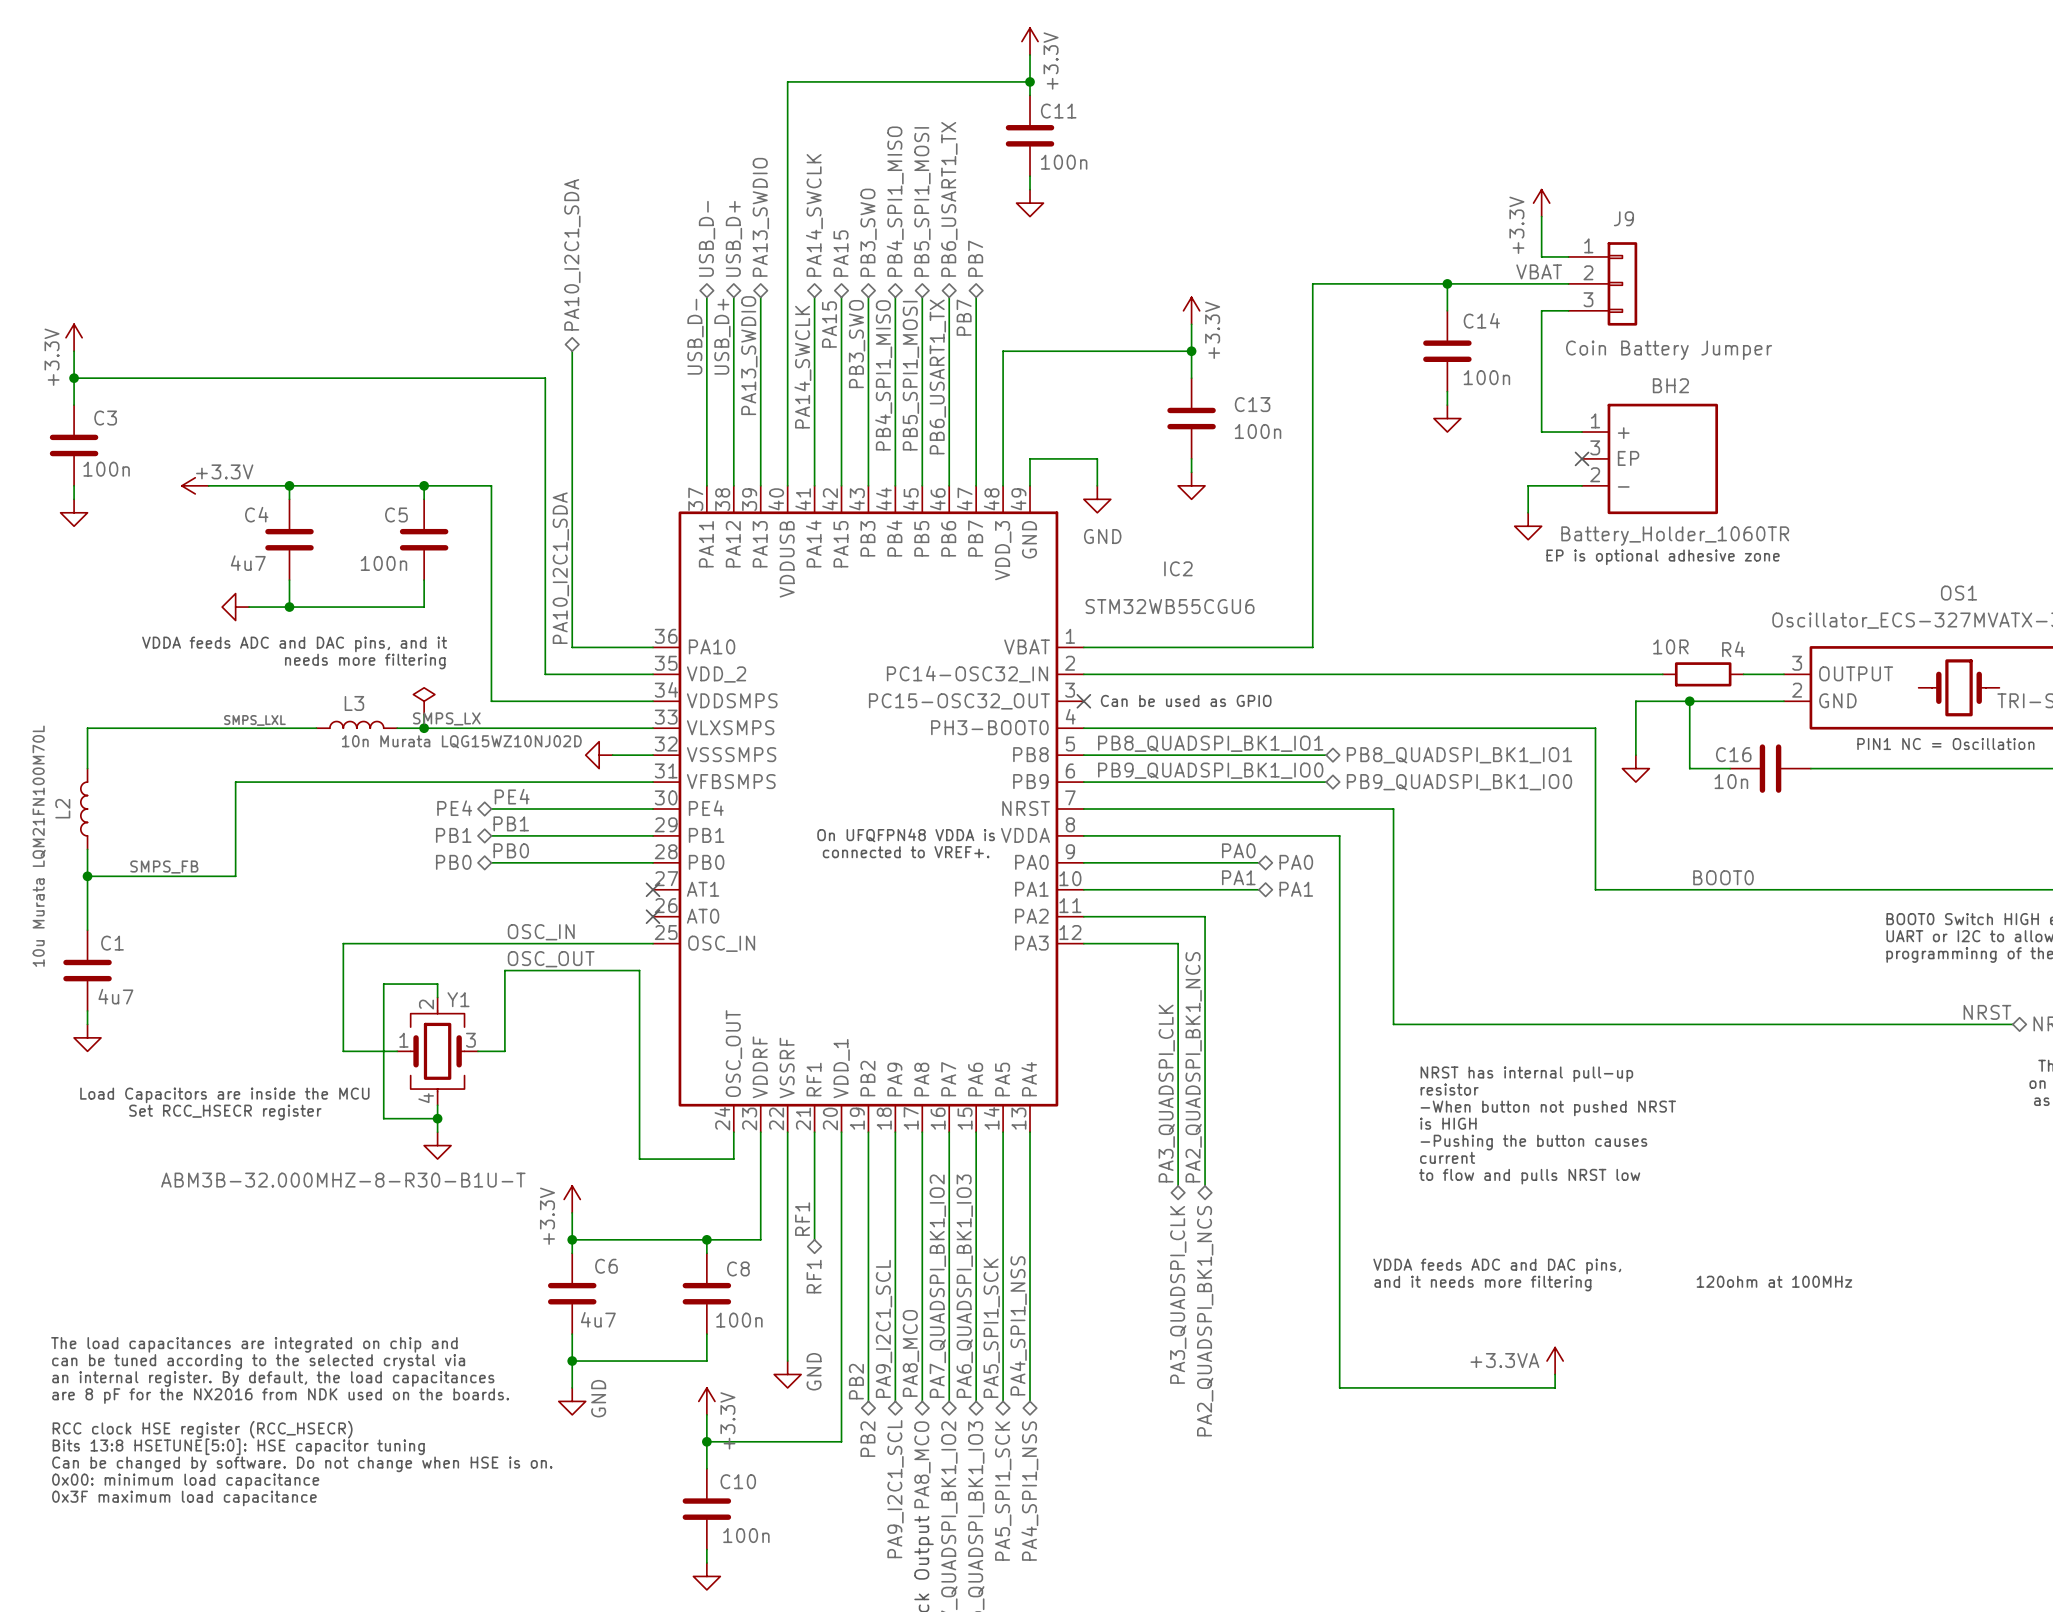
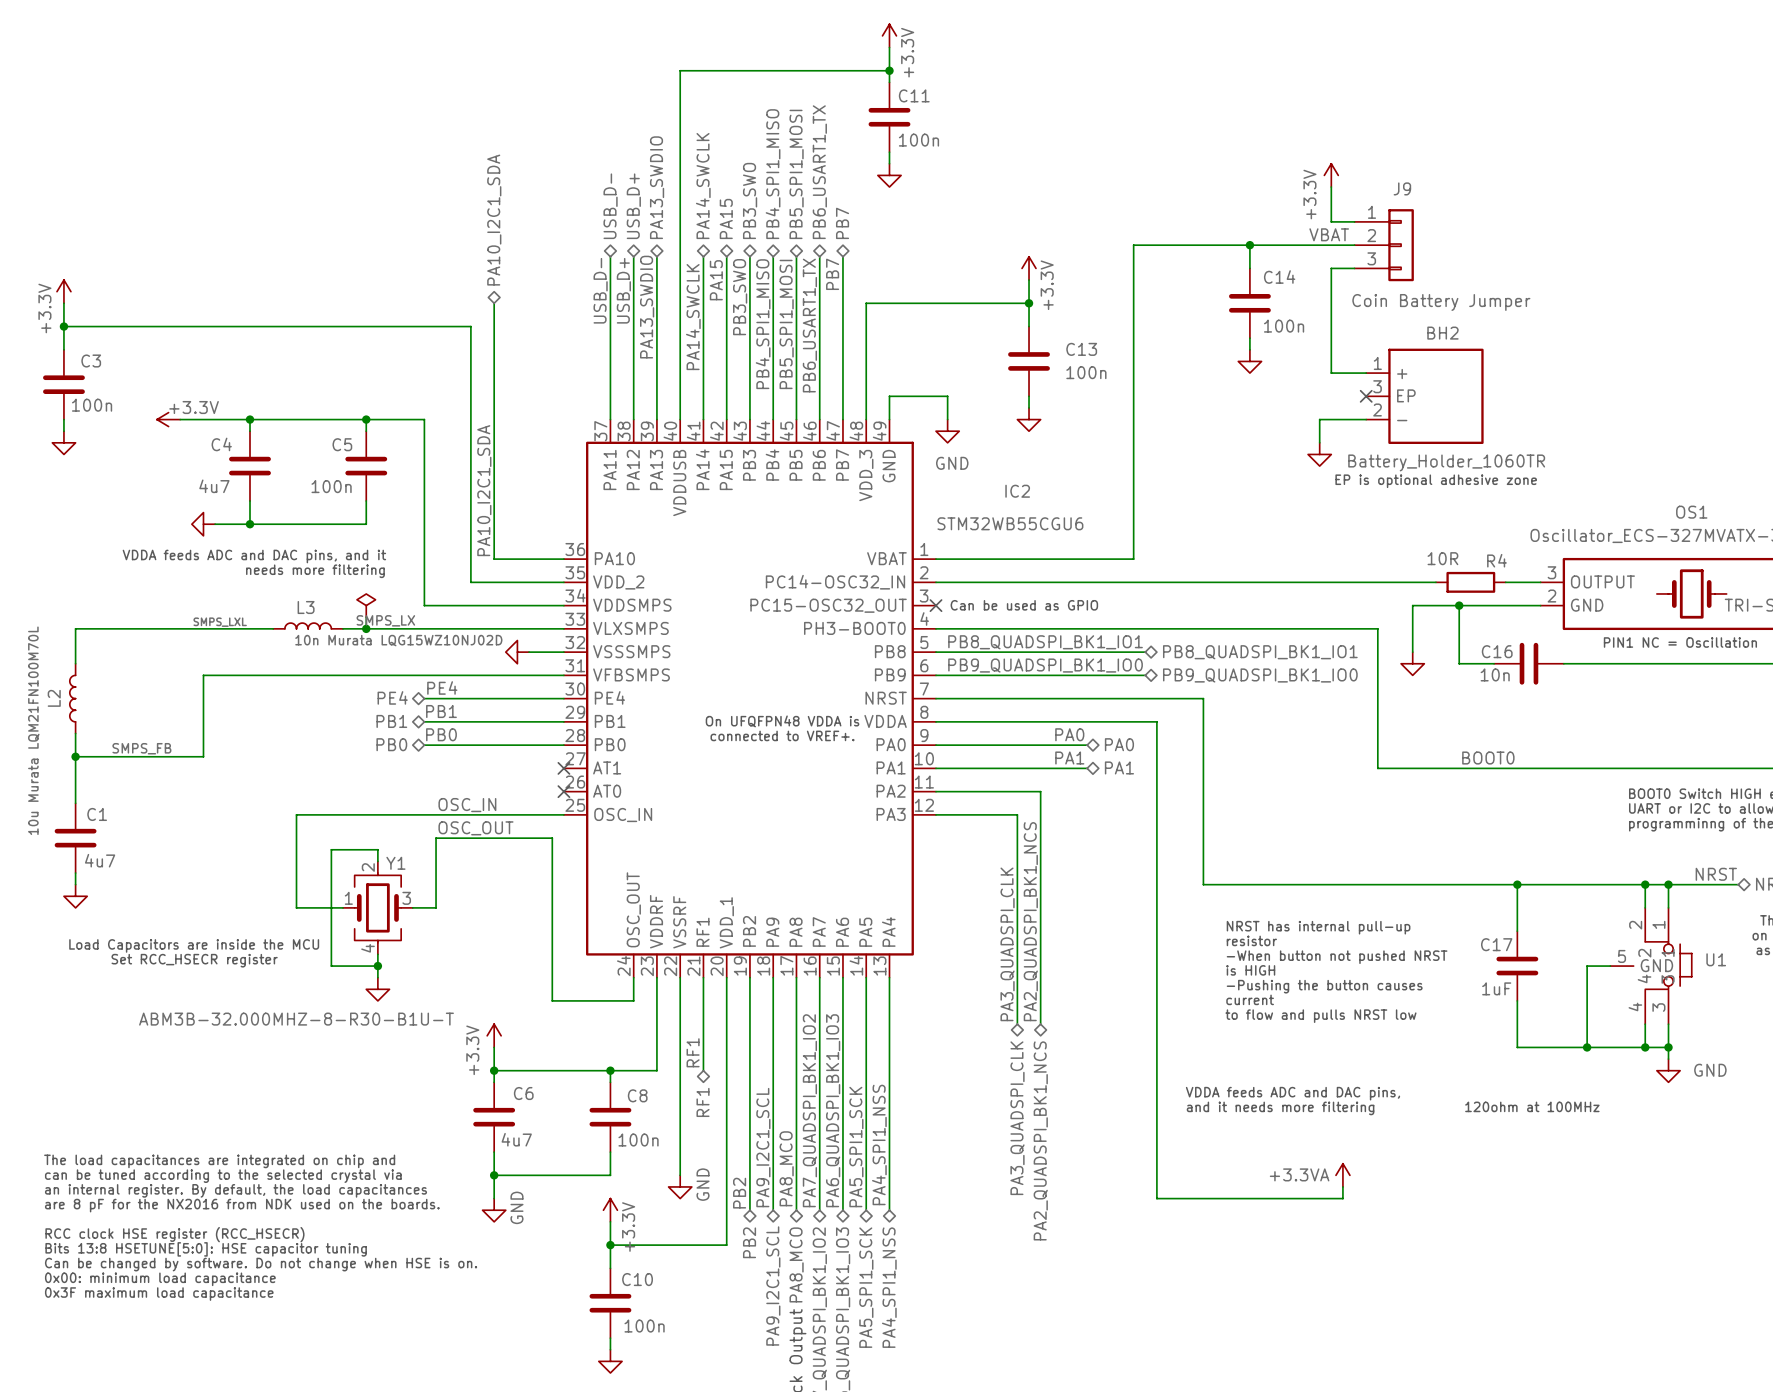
wire: none -> (1517, 884) (1517, 931)
junction: none -> (1517, 884)
wire: none -> (1645, 884) (1645, 907)
junction: none -> (1645, 884)
wire: none -> (1668, 884) (1668, 907)
junction: none -> (1668, 884)
C17: none -> 1uF (1517, 966)
wire: none -> (1610, 966) (1587, 966) (1587, 1047)
U1: none -> (1651, 966)
wire: none -> (1517, 1000) (1517, 1047) (1668, 1047)
wire: none -> (1645, 1024) (1645, 1047)
wire: none -> (1668, 1024) (1668, 1059)
junction: none -> (1587, 1047)
junction: none -> (1645, 1047)
junction: none -> (1668, 1047)
power symbol: none -> GND (1668, 1070)

